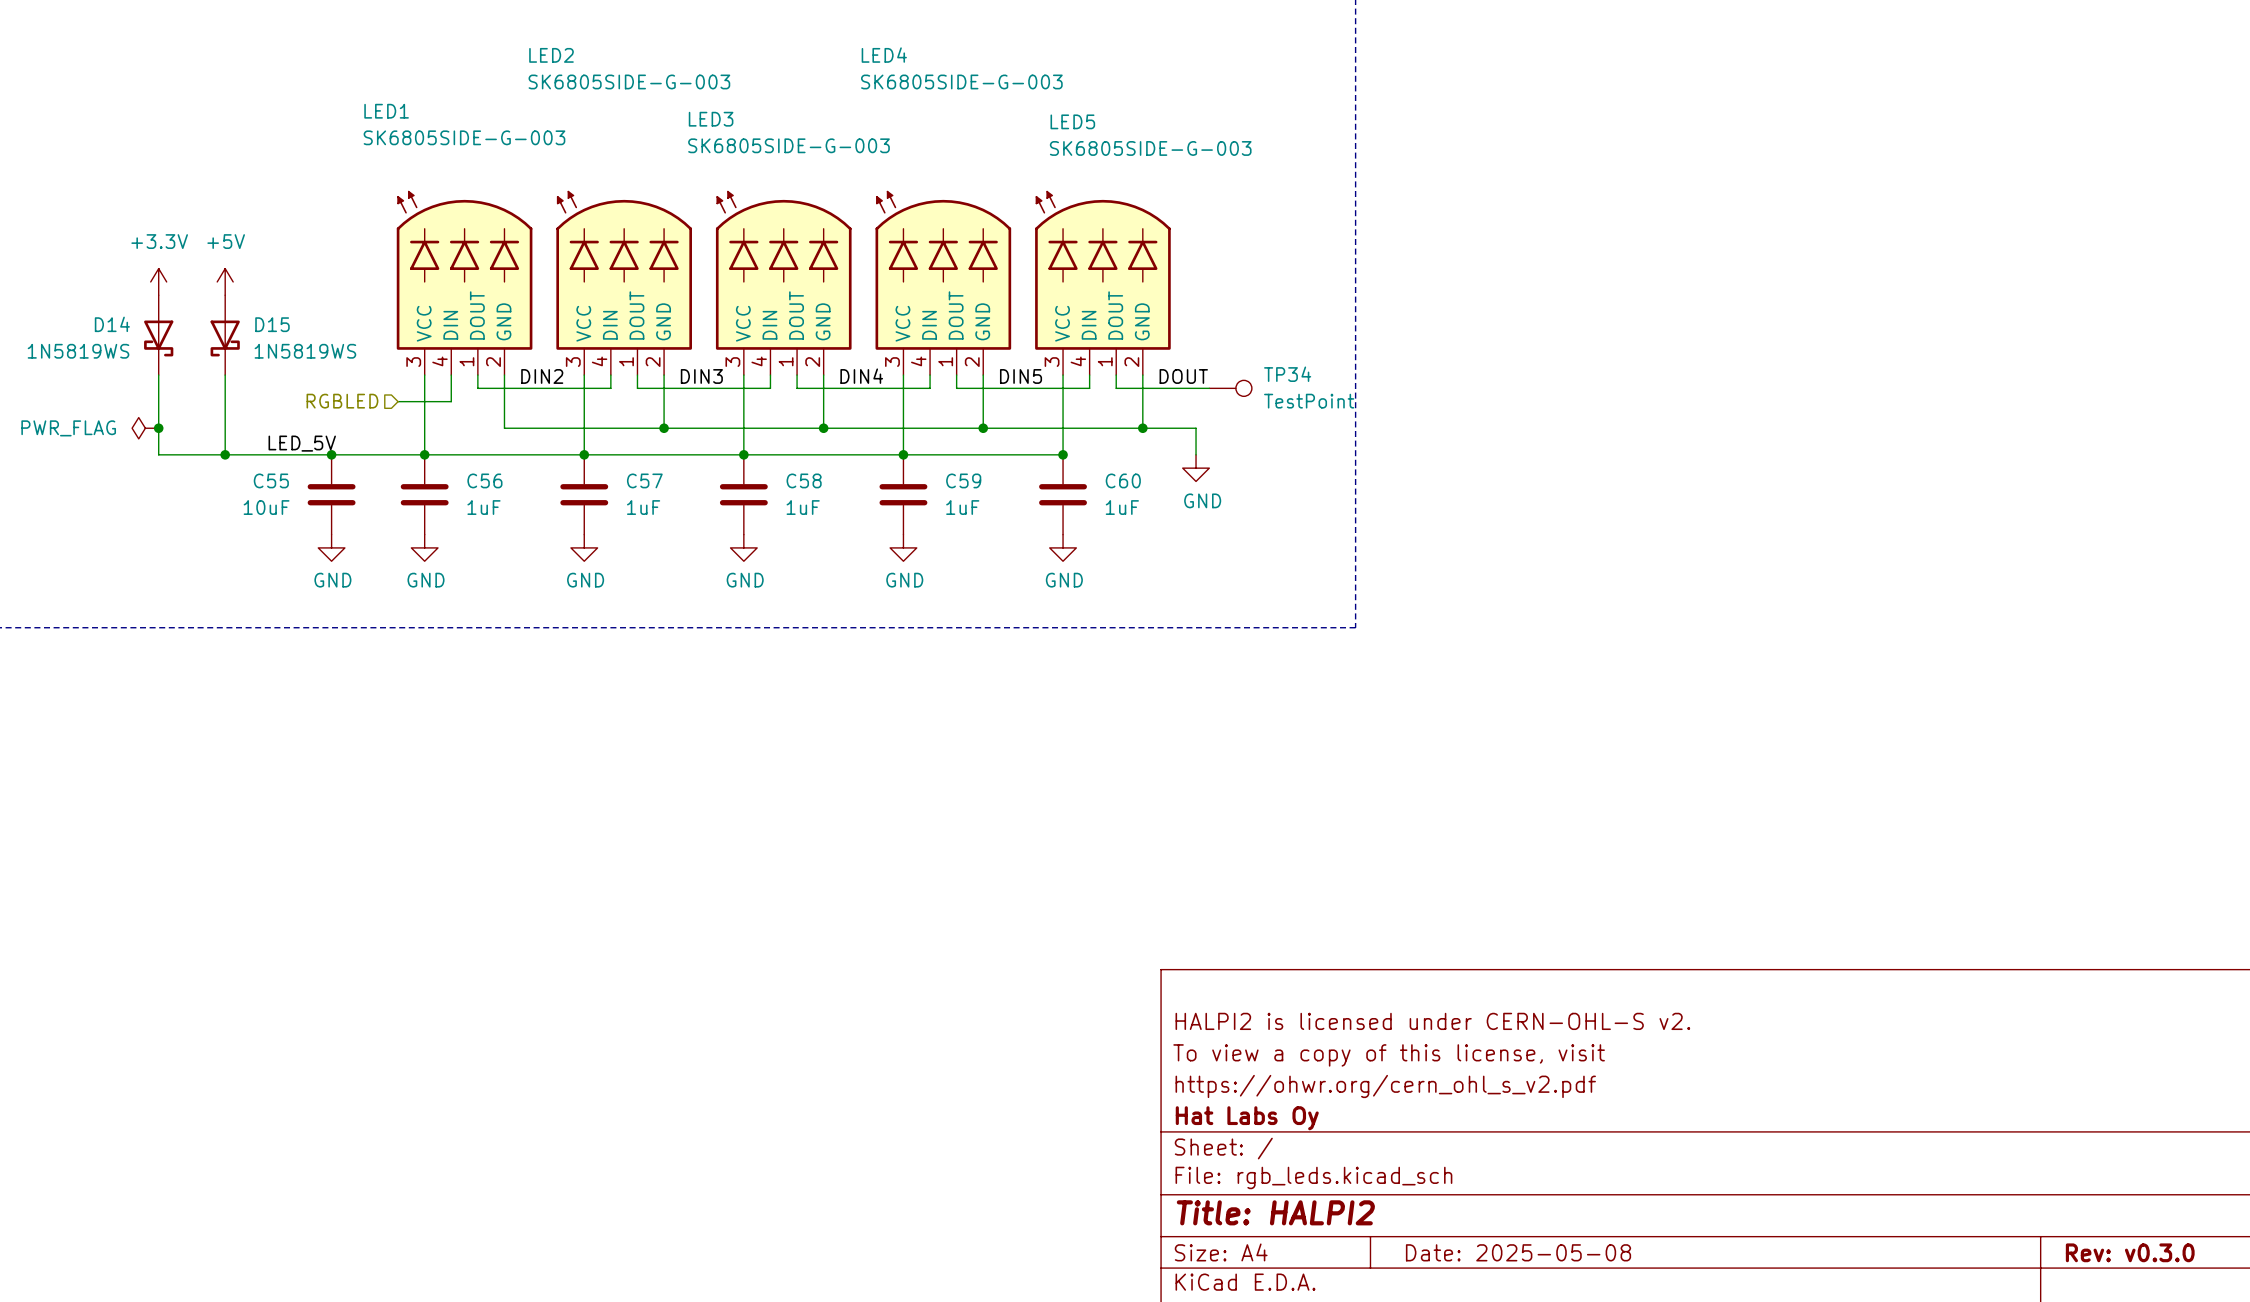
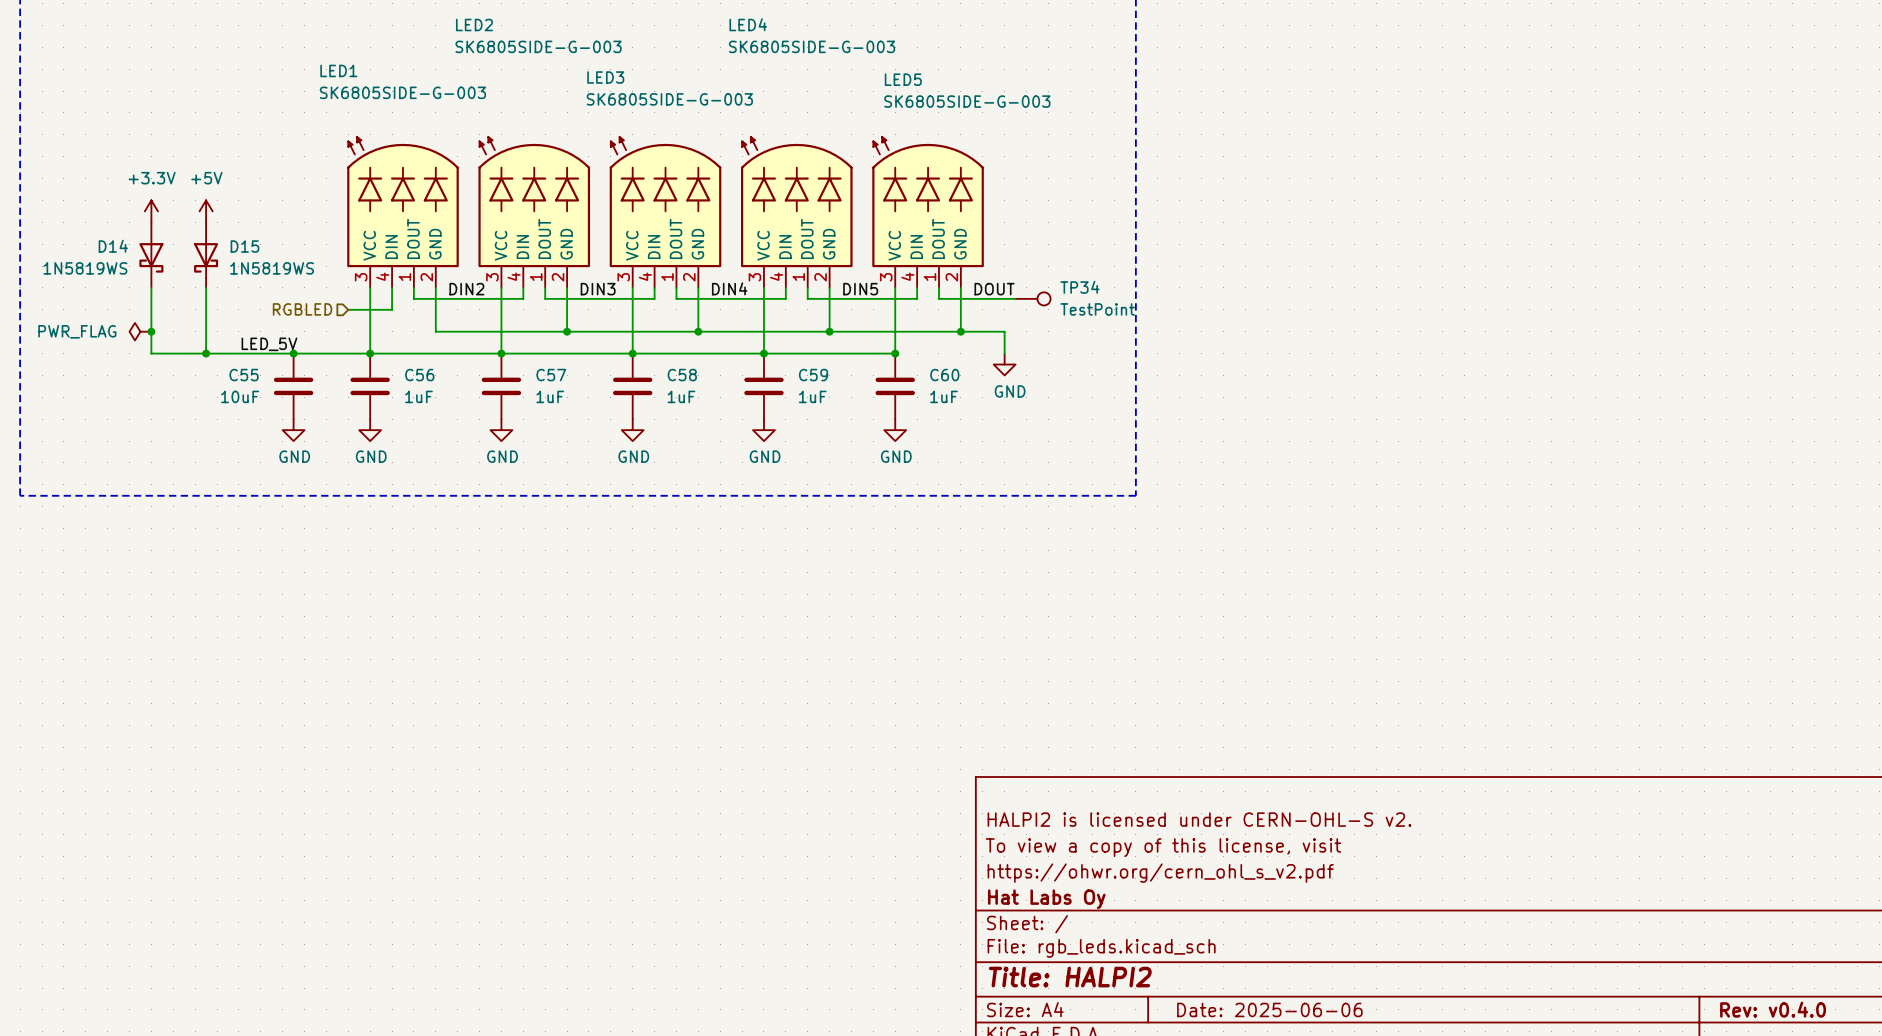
title block: Date: 2025-05-08 (1518, 1252) -> Date: 2025-06-06 (1269, 1009)
title block: Rev: v0.3.0 (2130, 1252) -> Rev: v0.4.0 (1773, 1009)

